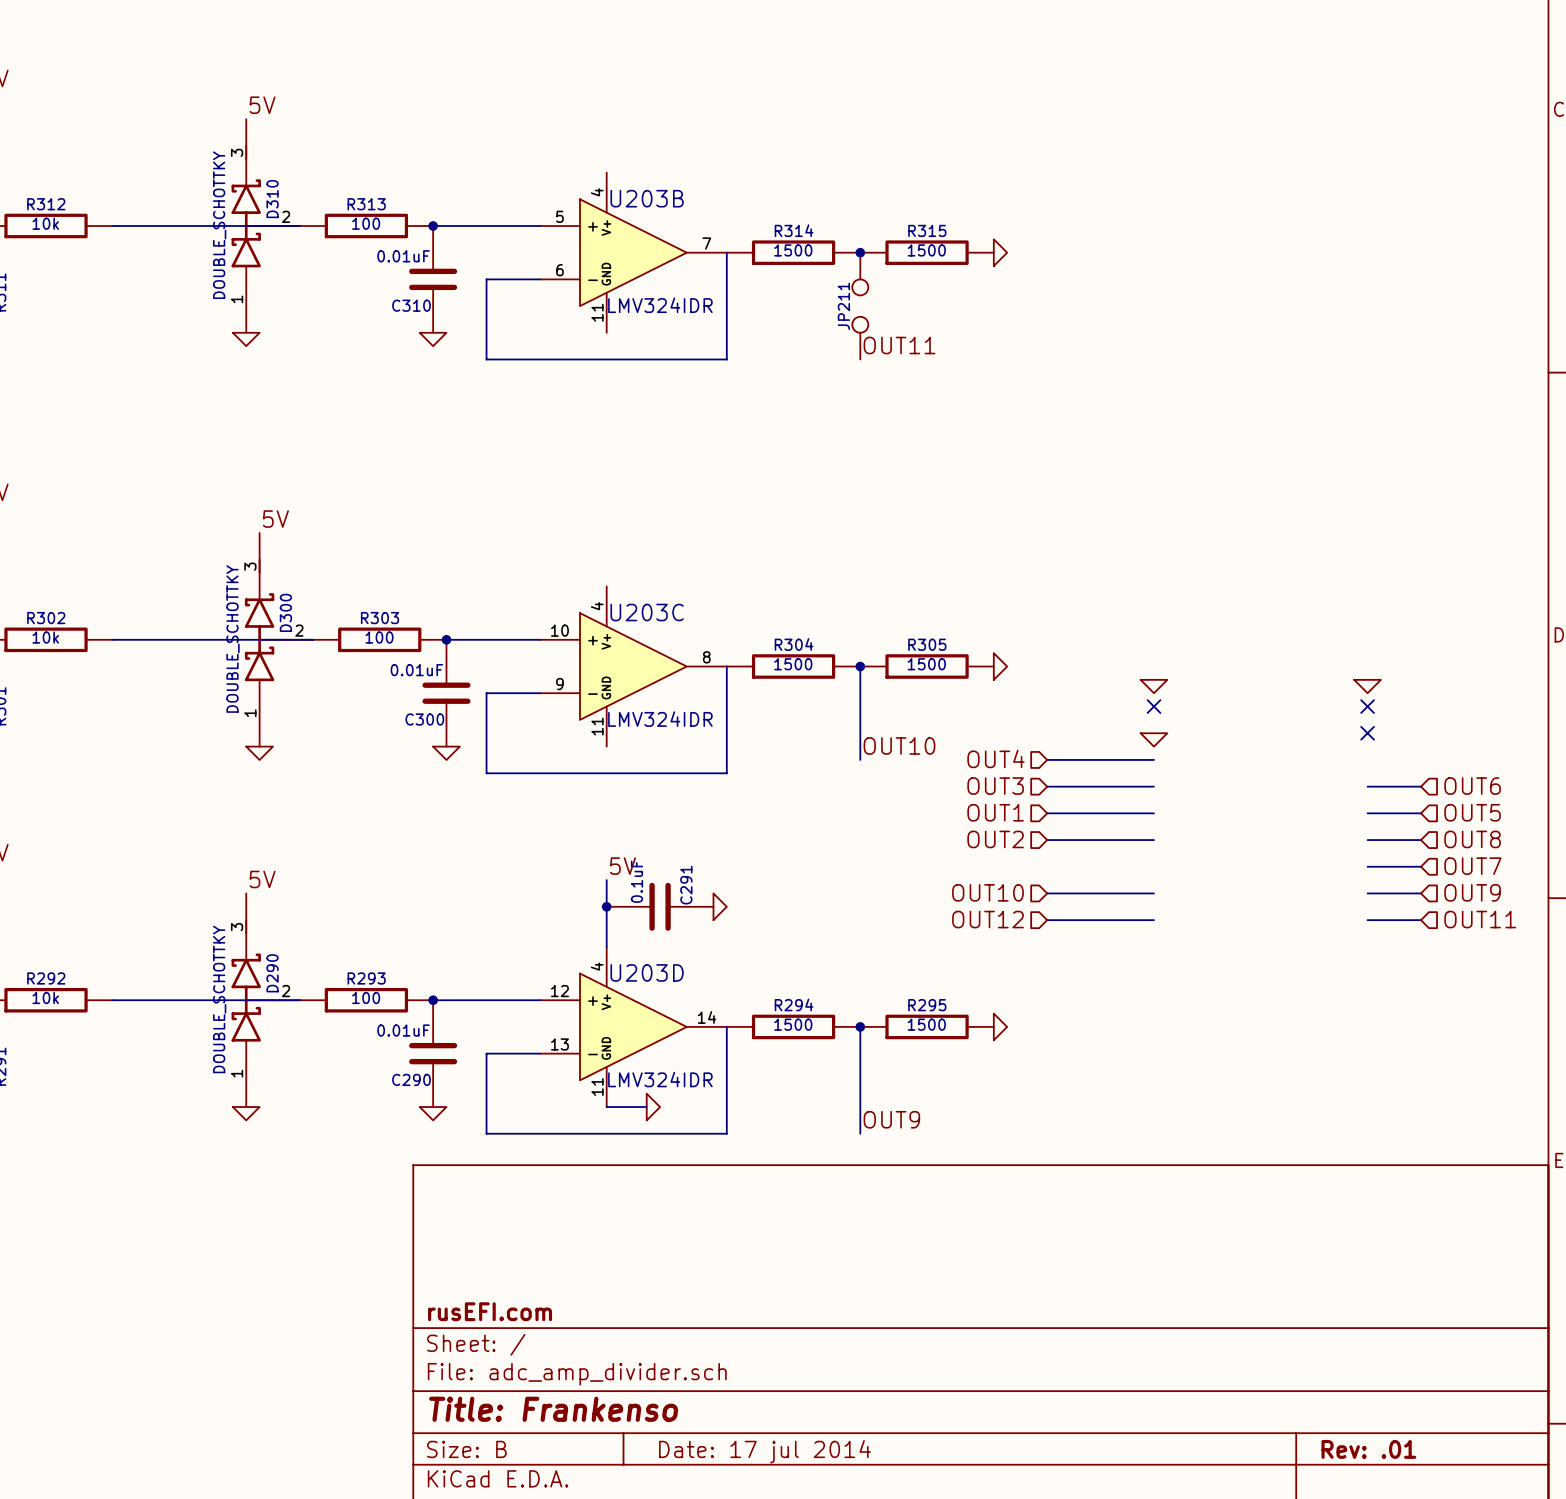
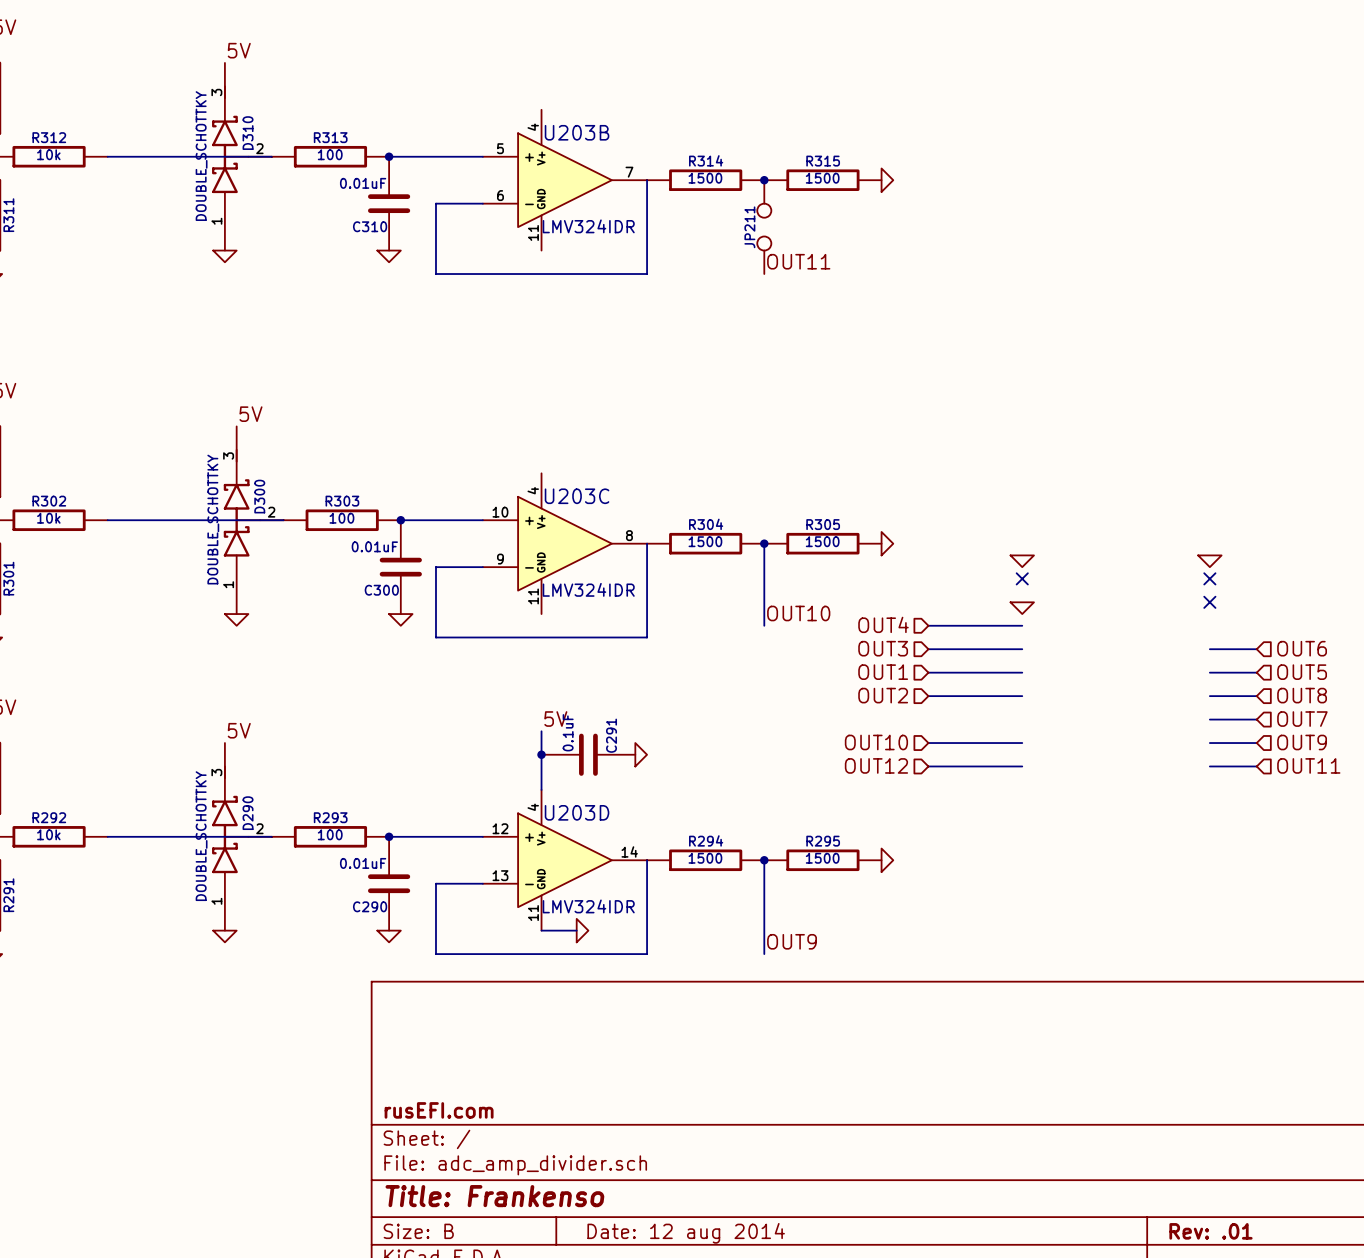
title block: Date: 17 jul 2014 (764, 1451) -> Date: 12 aug 2014 (686, 1233)

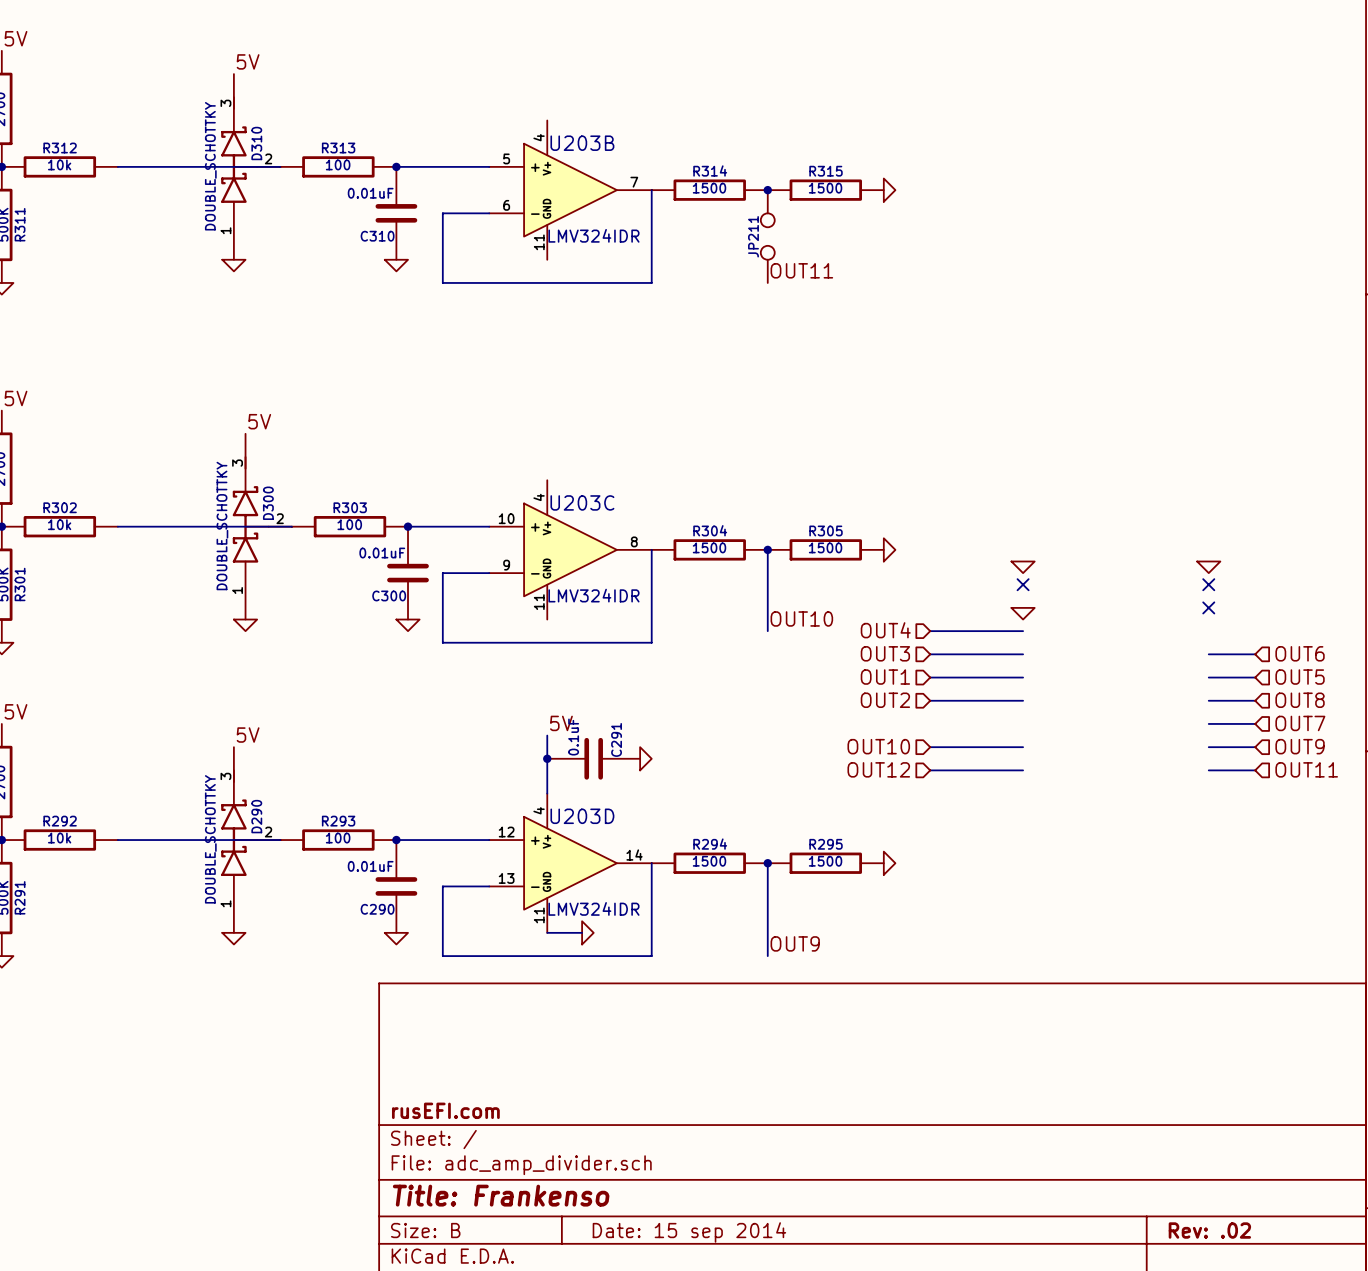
title block: Rev: .01 (1210, 1231) -> Rev: .02 (1209, 1230)
title block: Date: 12 aug 2014 (686, 1233) -> Date: 15 sep 2014 (689, 1232)

